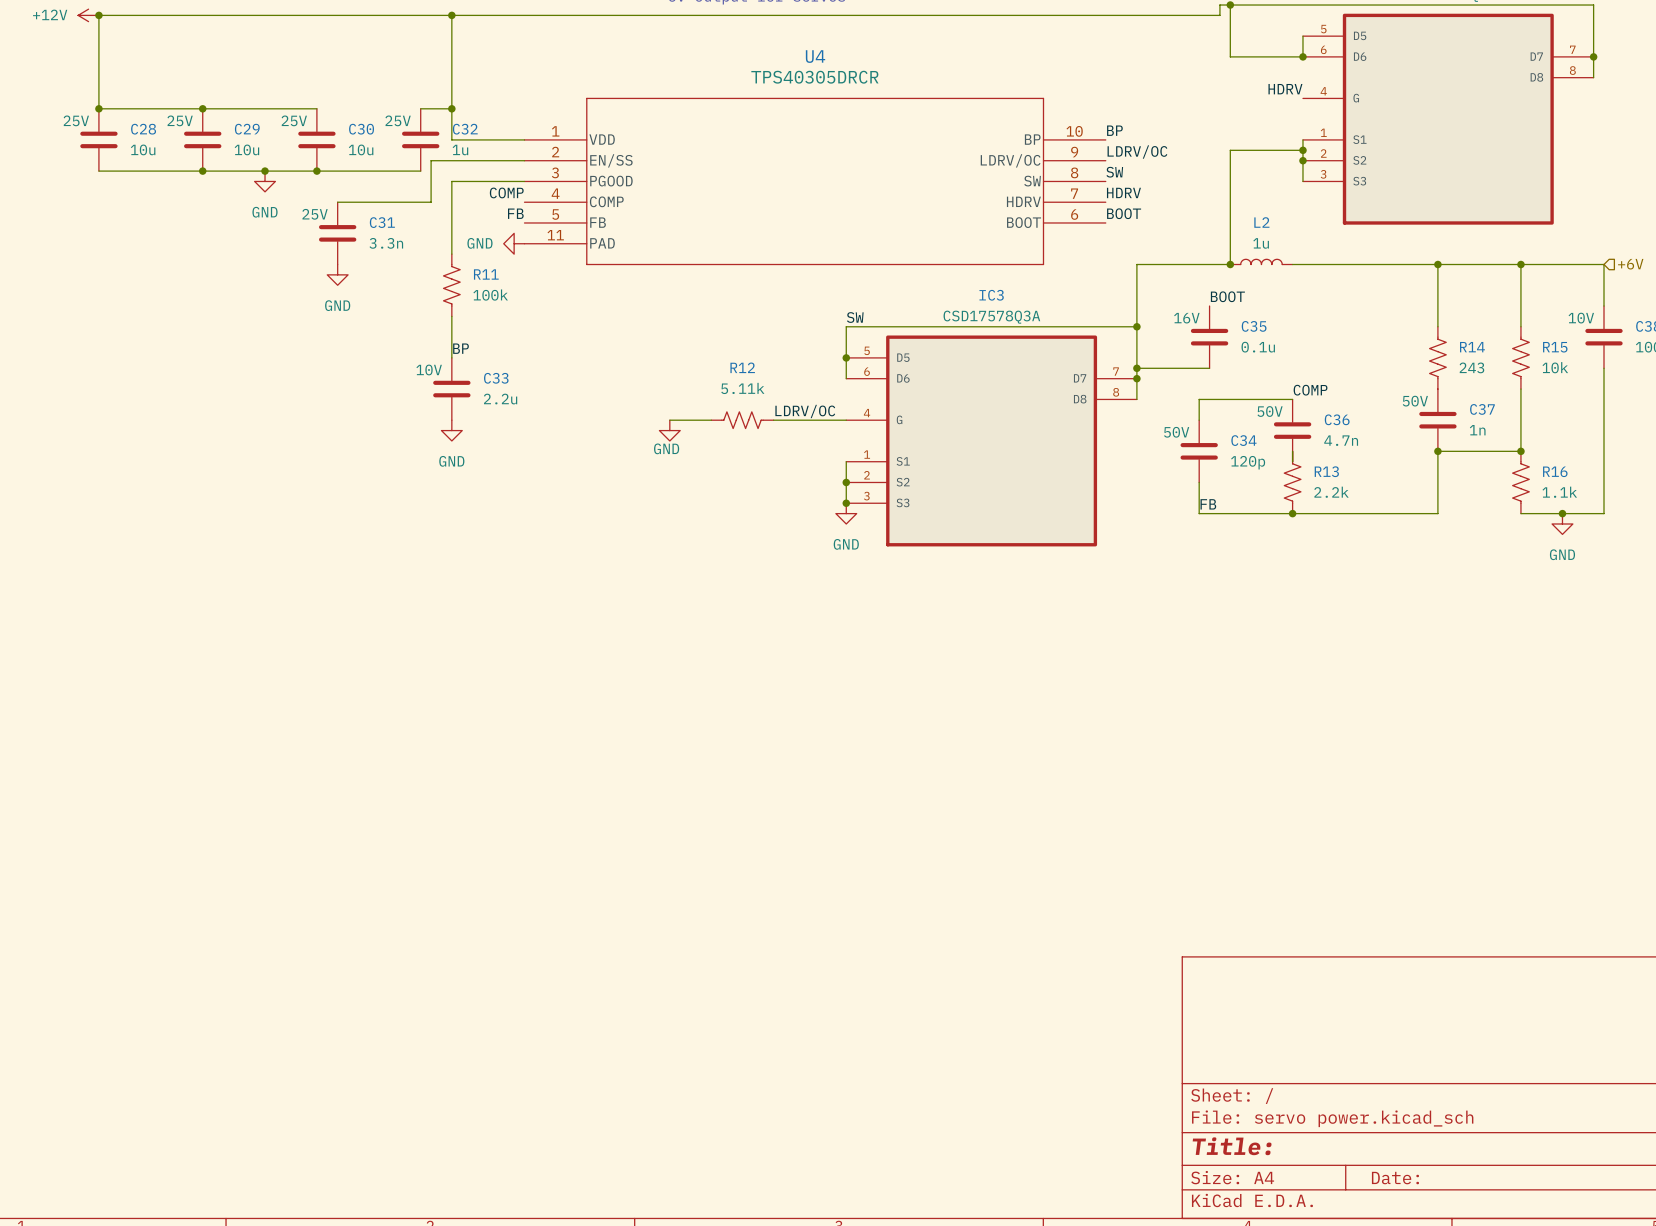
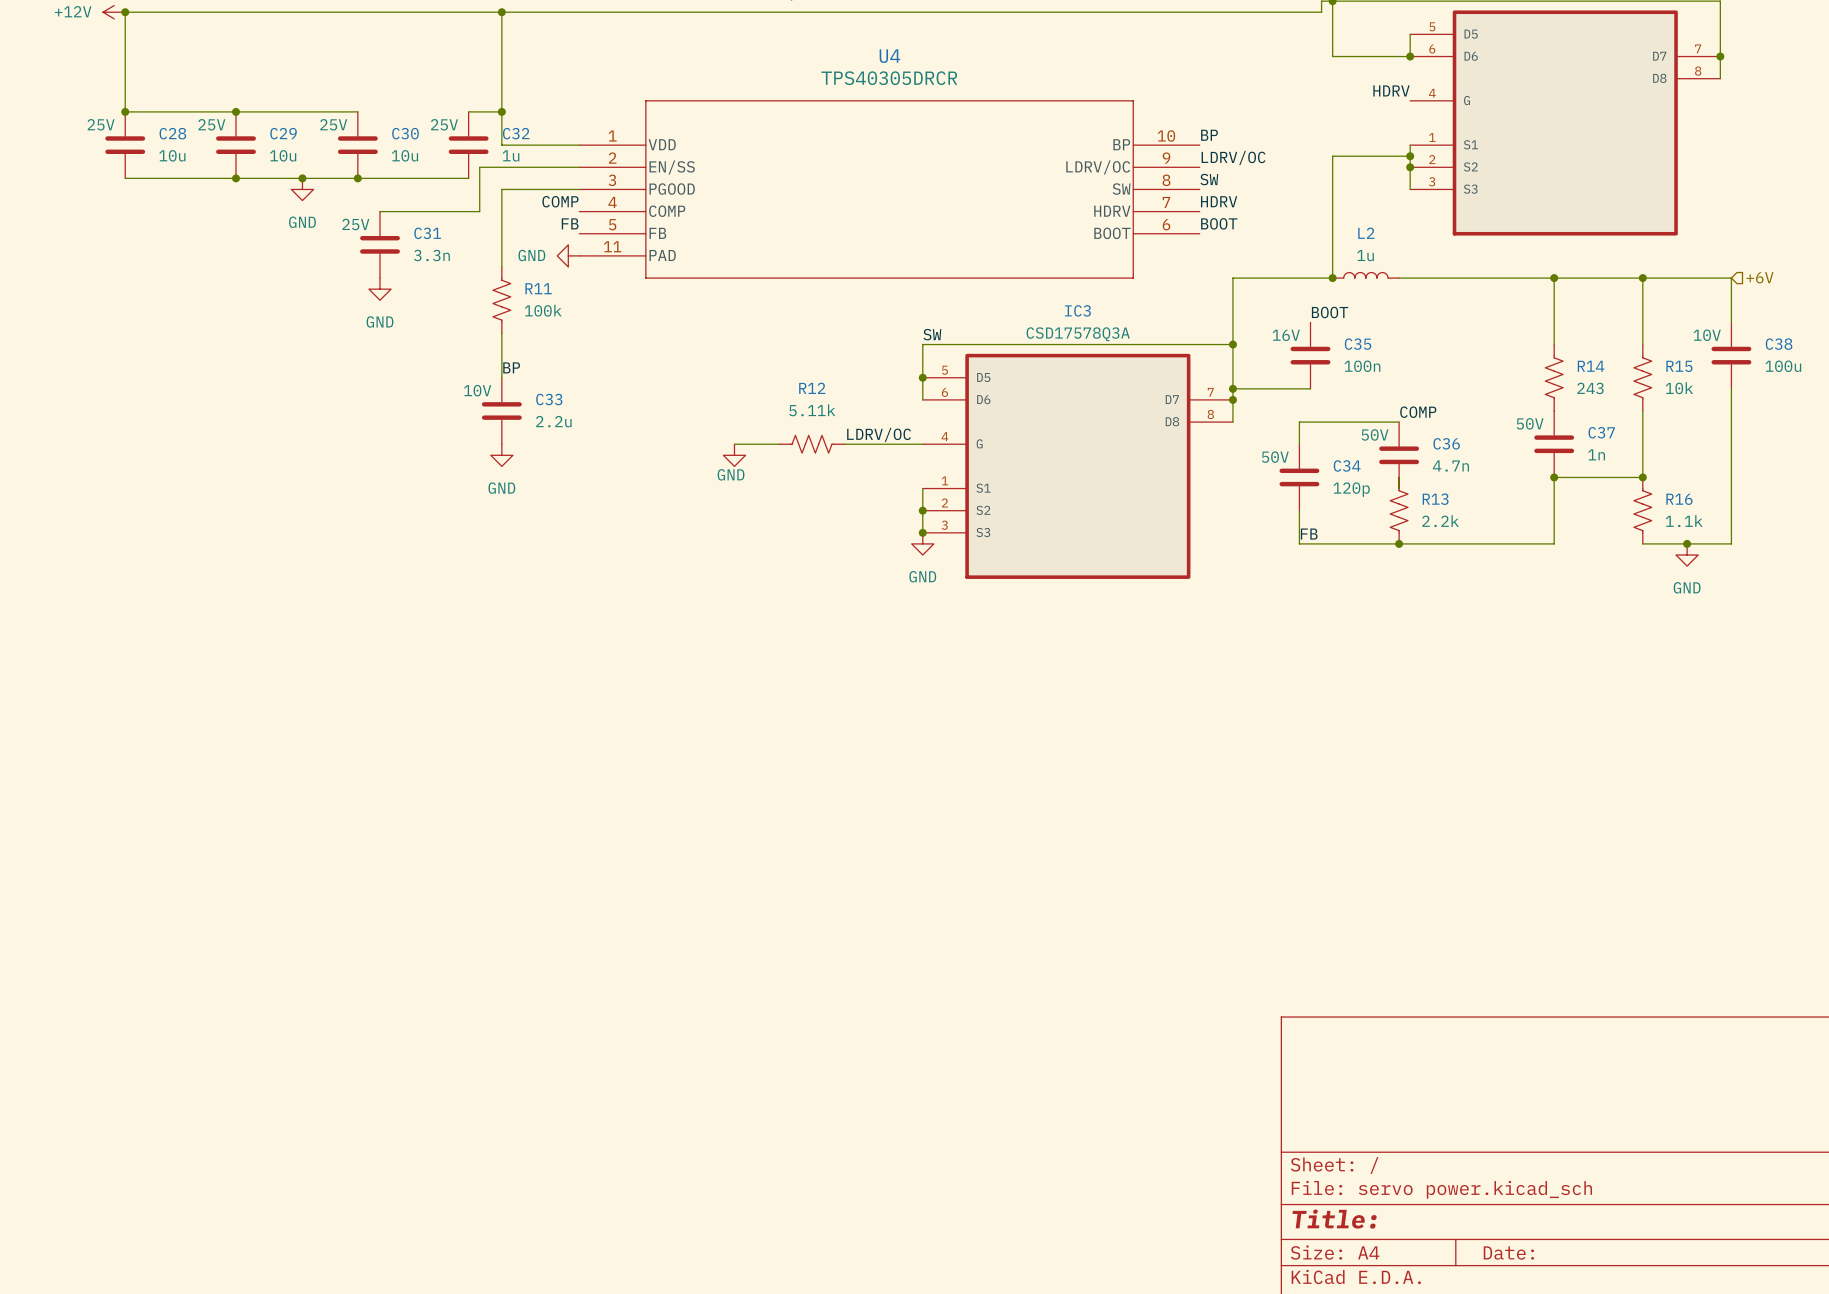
C35 value: 0.1u (1258, 347) -> 100n (1362, 366)

